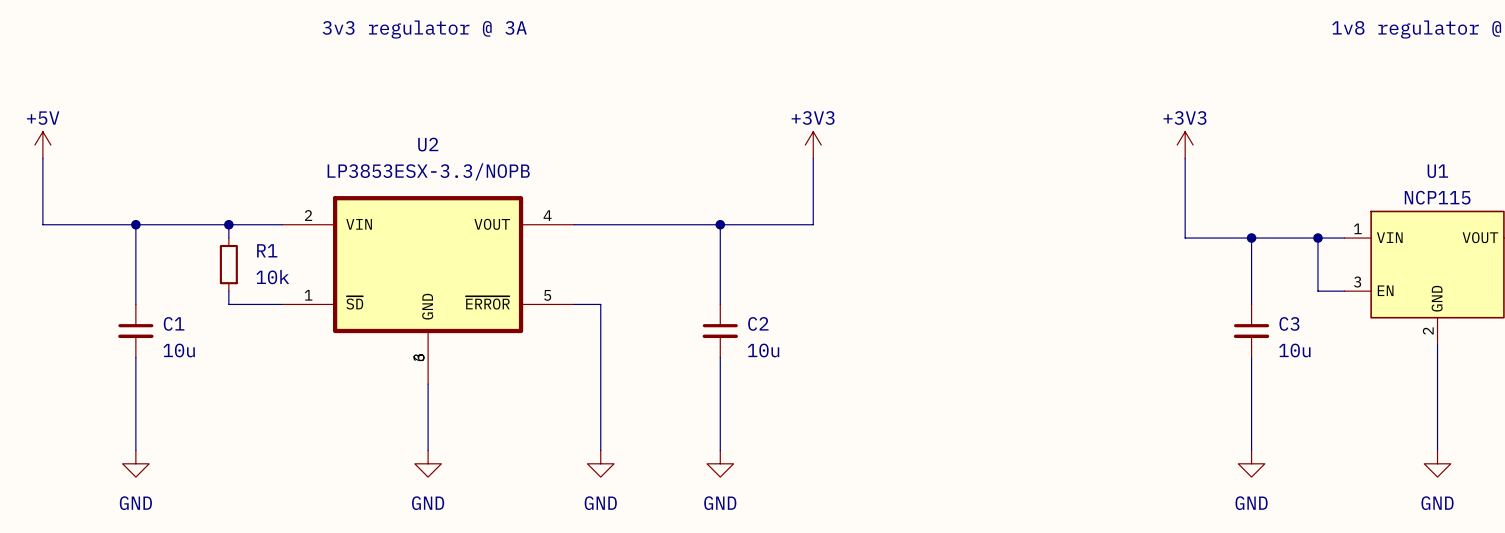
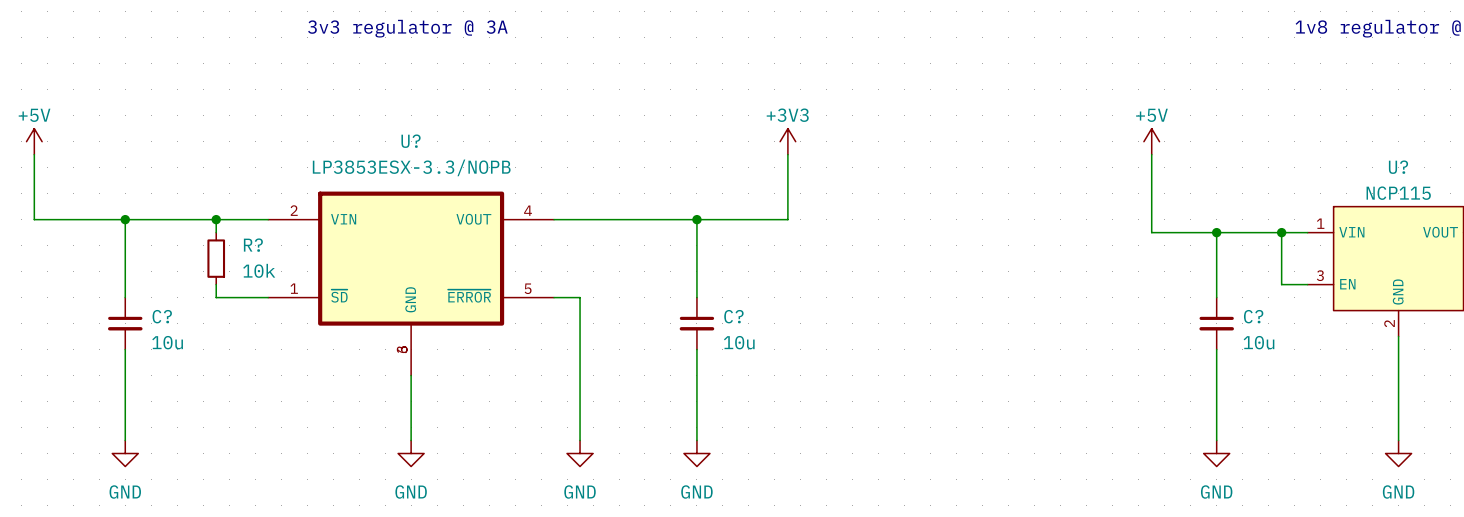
U2 name: U2 (428, 144) -> U? (411, 141)
power symbol: +3V3 (1185, 145) -> +5V (1151, 141)
U1 name: U1 (1437, 171) -> U? (1398, 167)
R1 name: R1 (267, 250) -> R? (253, 245)
C1 name: C1 (174, 323) -> C? (162, 316)
C2 name: C2 (758, 323) -> C? (733, 316)
C3 name: C3 (1289, 323) -> C? (1253, 316)

